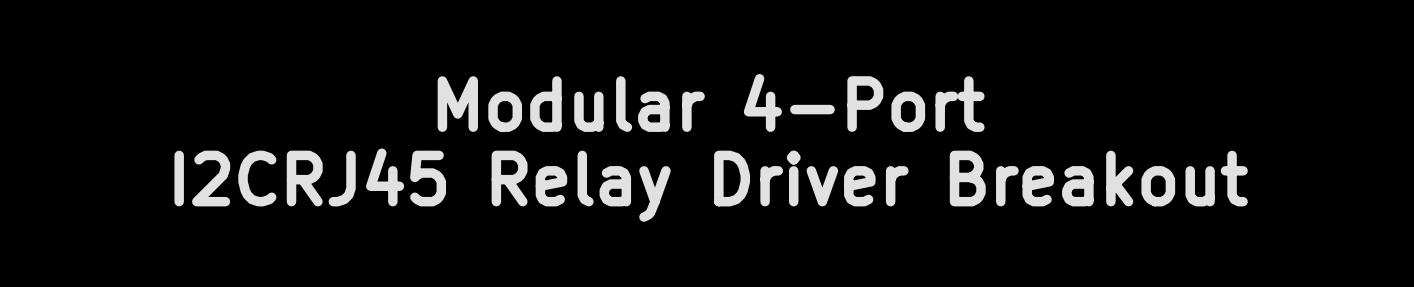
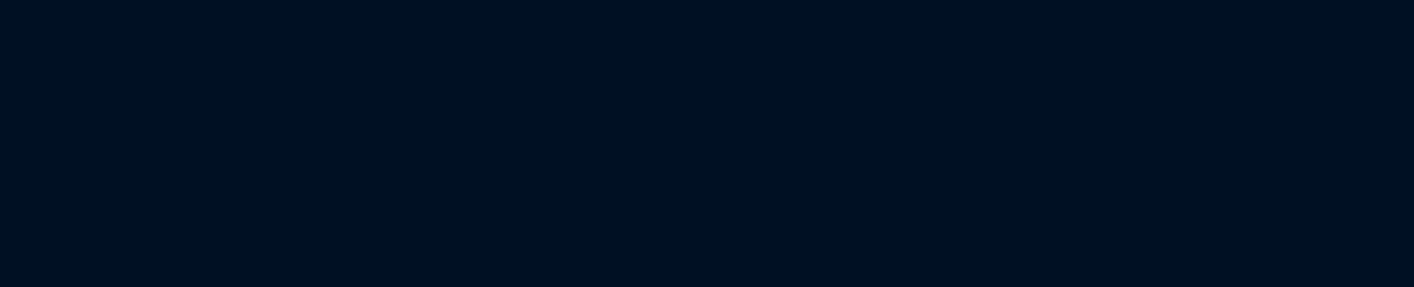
text: Modular 4-Port (711, 102) -> none
text: I2CRJ45 Relay Driver Breakout (711, 185) -> none

